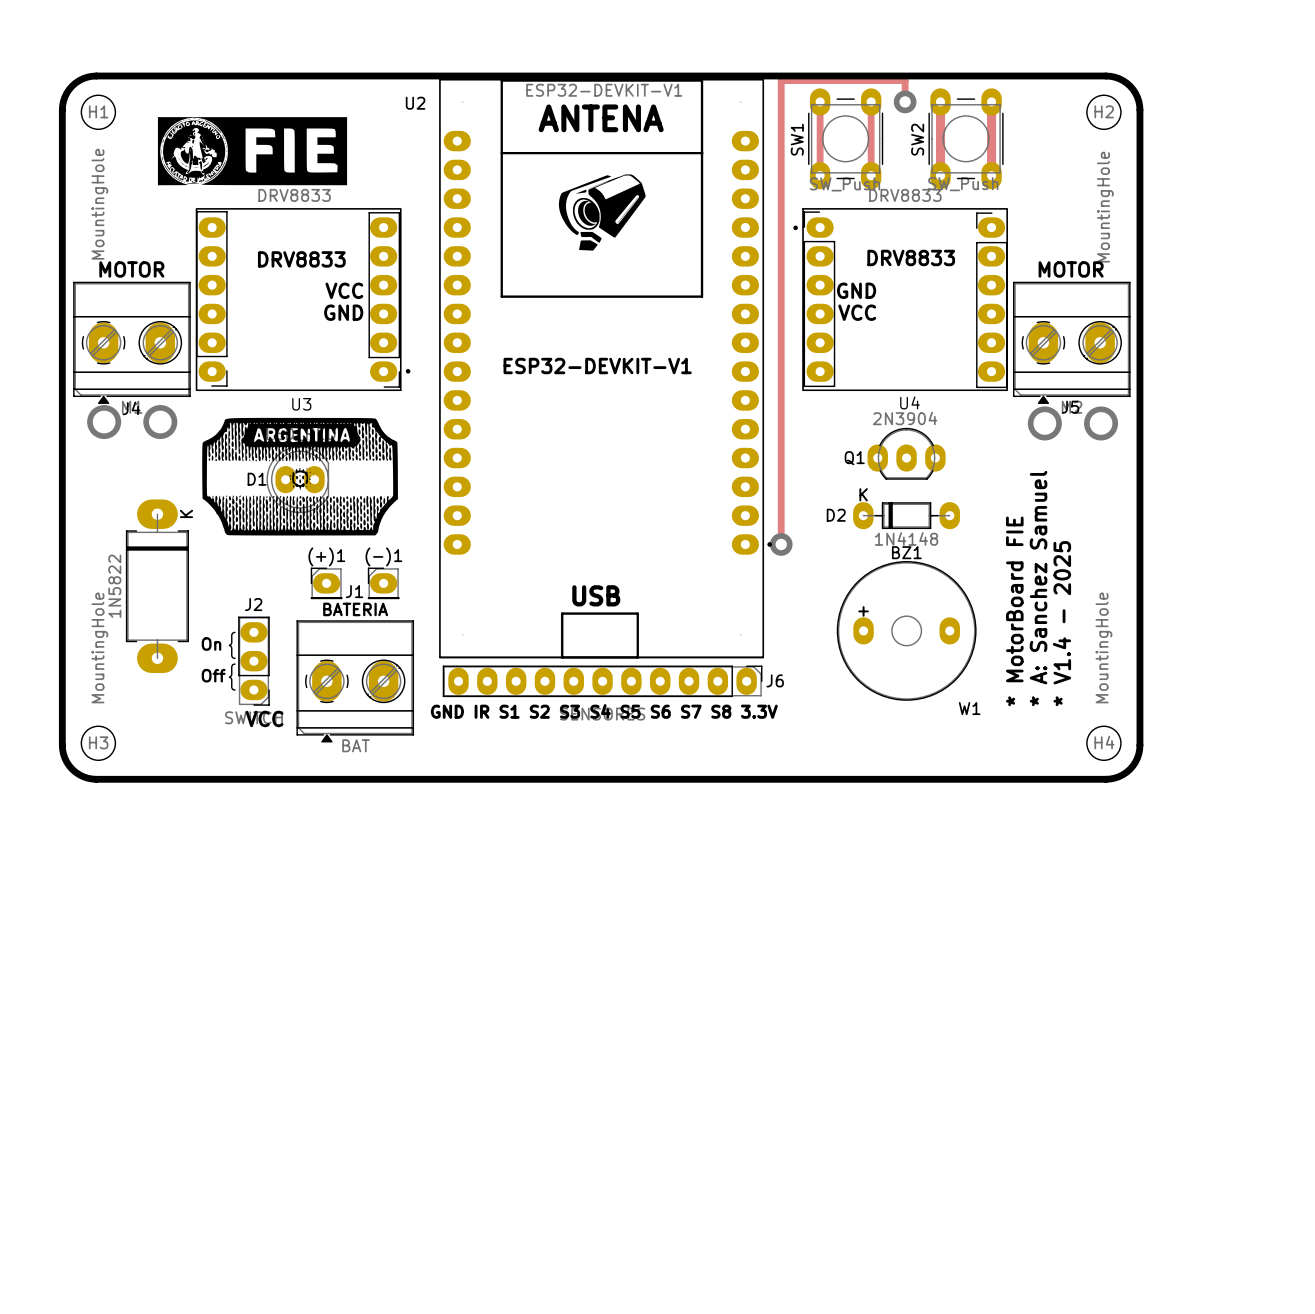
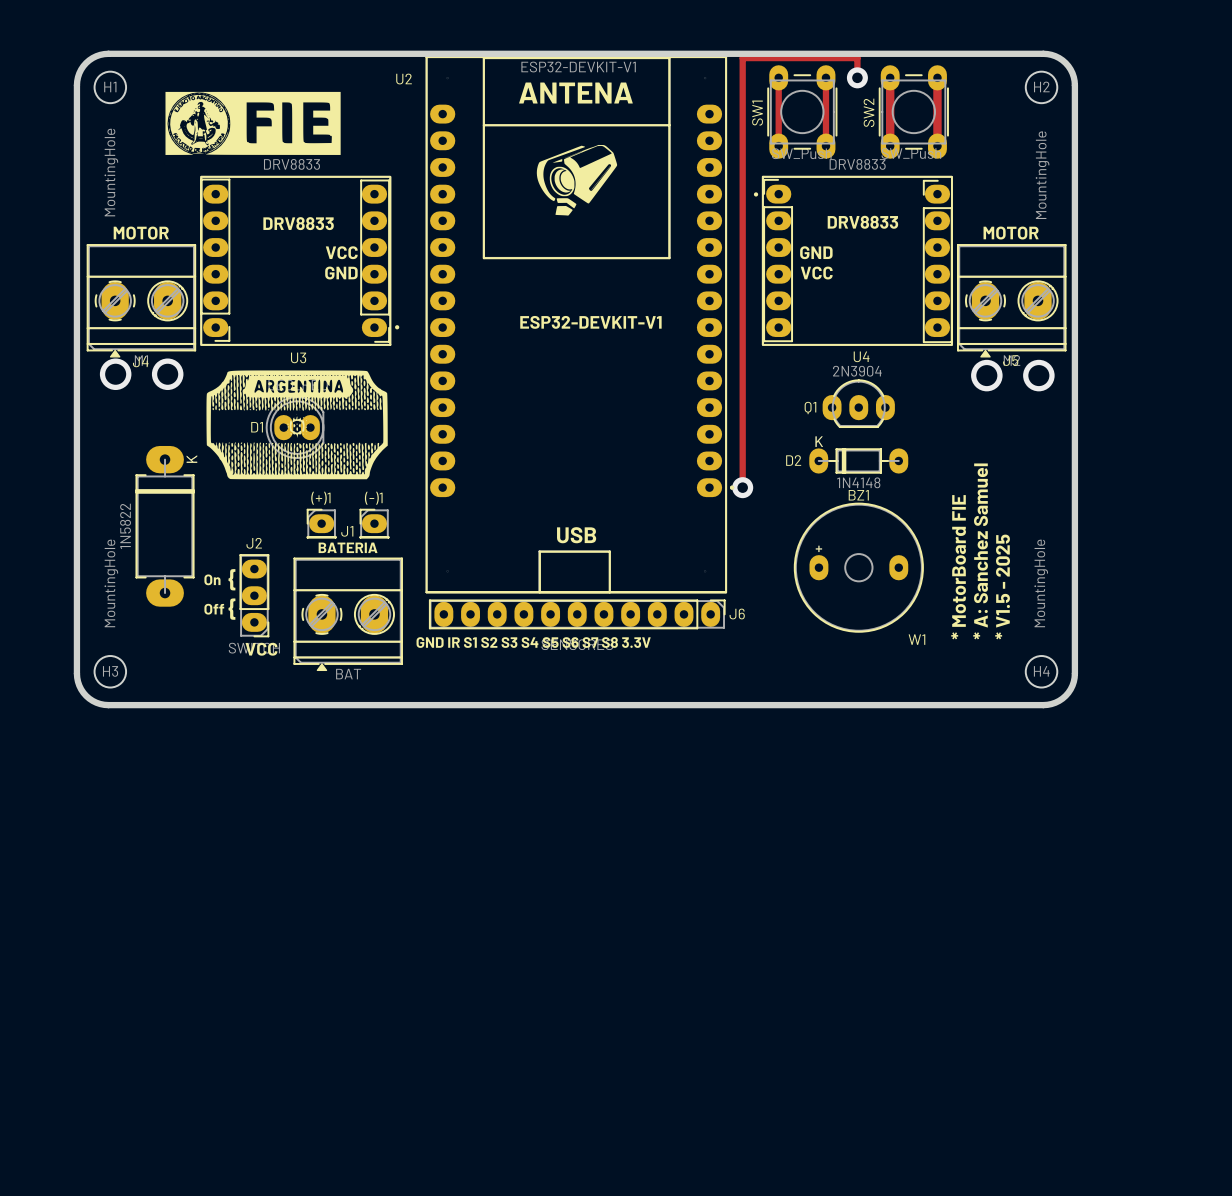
text: * V1.4 - 2025 (1061, 623) -> * V1.5 - 2025 (1002, 586)

